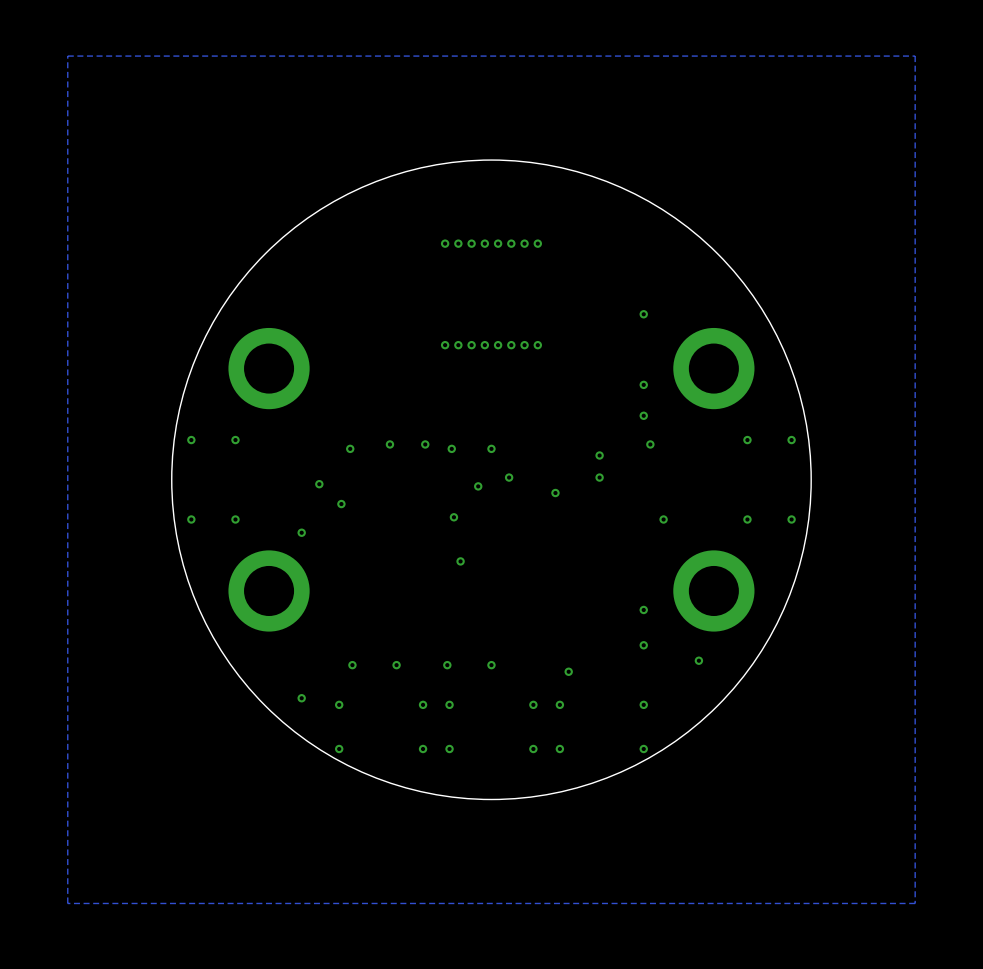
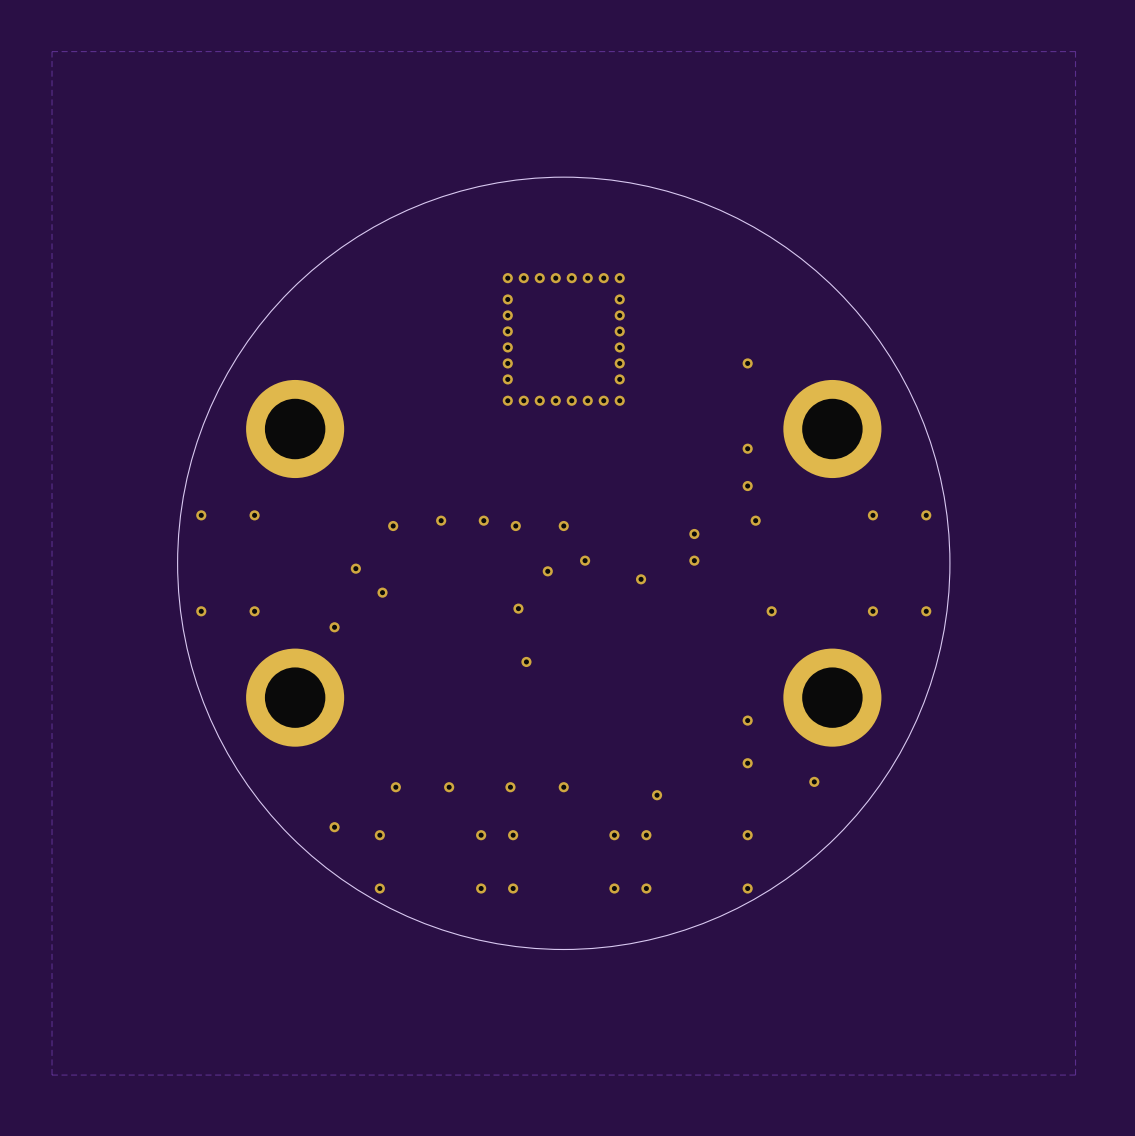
via: none -> (507, 299)
via: none -> (619, 299)
via: none -> (507, 315)
via: none -> (619, 315)
via: none -> (507, 331)
via: none -> (619, 331)
via: none -> (507, 347)
via: none -> (619, 347)
via: none -> (507, 363)
via: none -> (619, 363)
via: none -> (507, 379)
via: none -> (619, 379)

